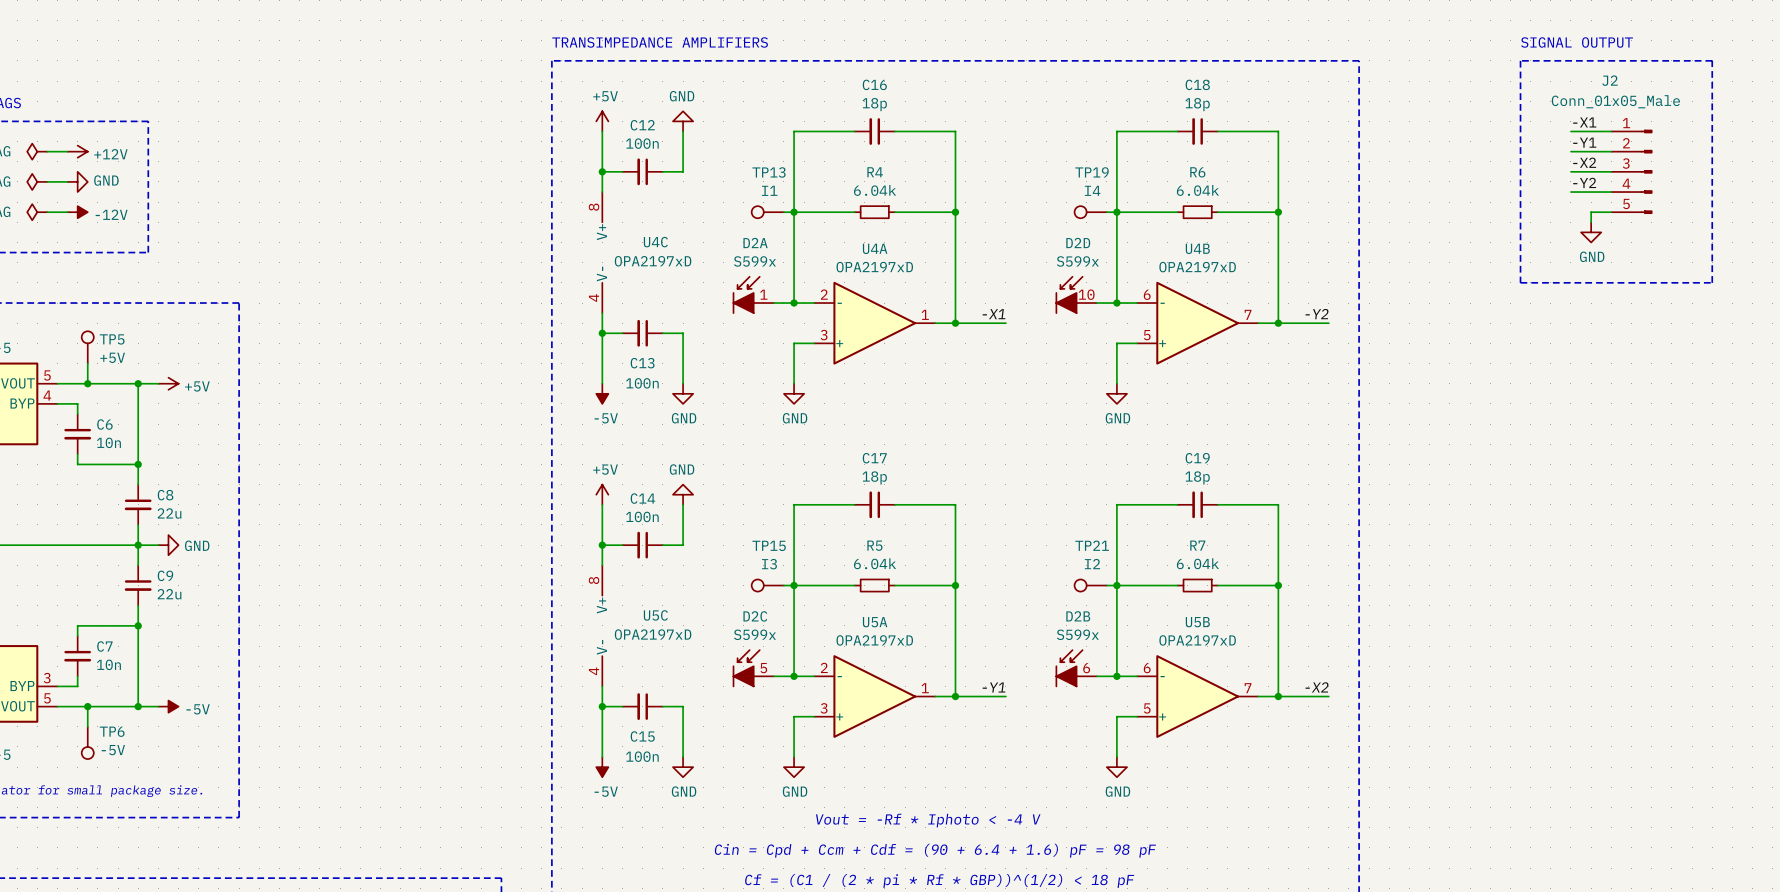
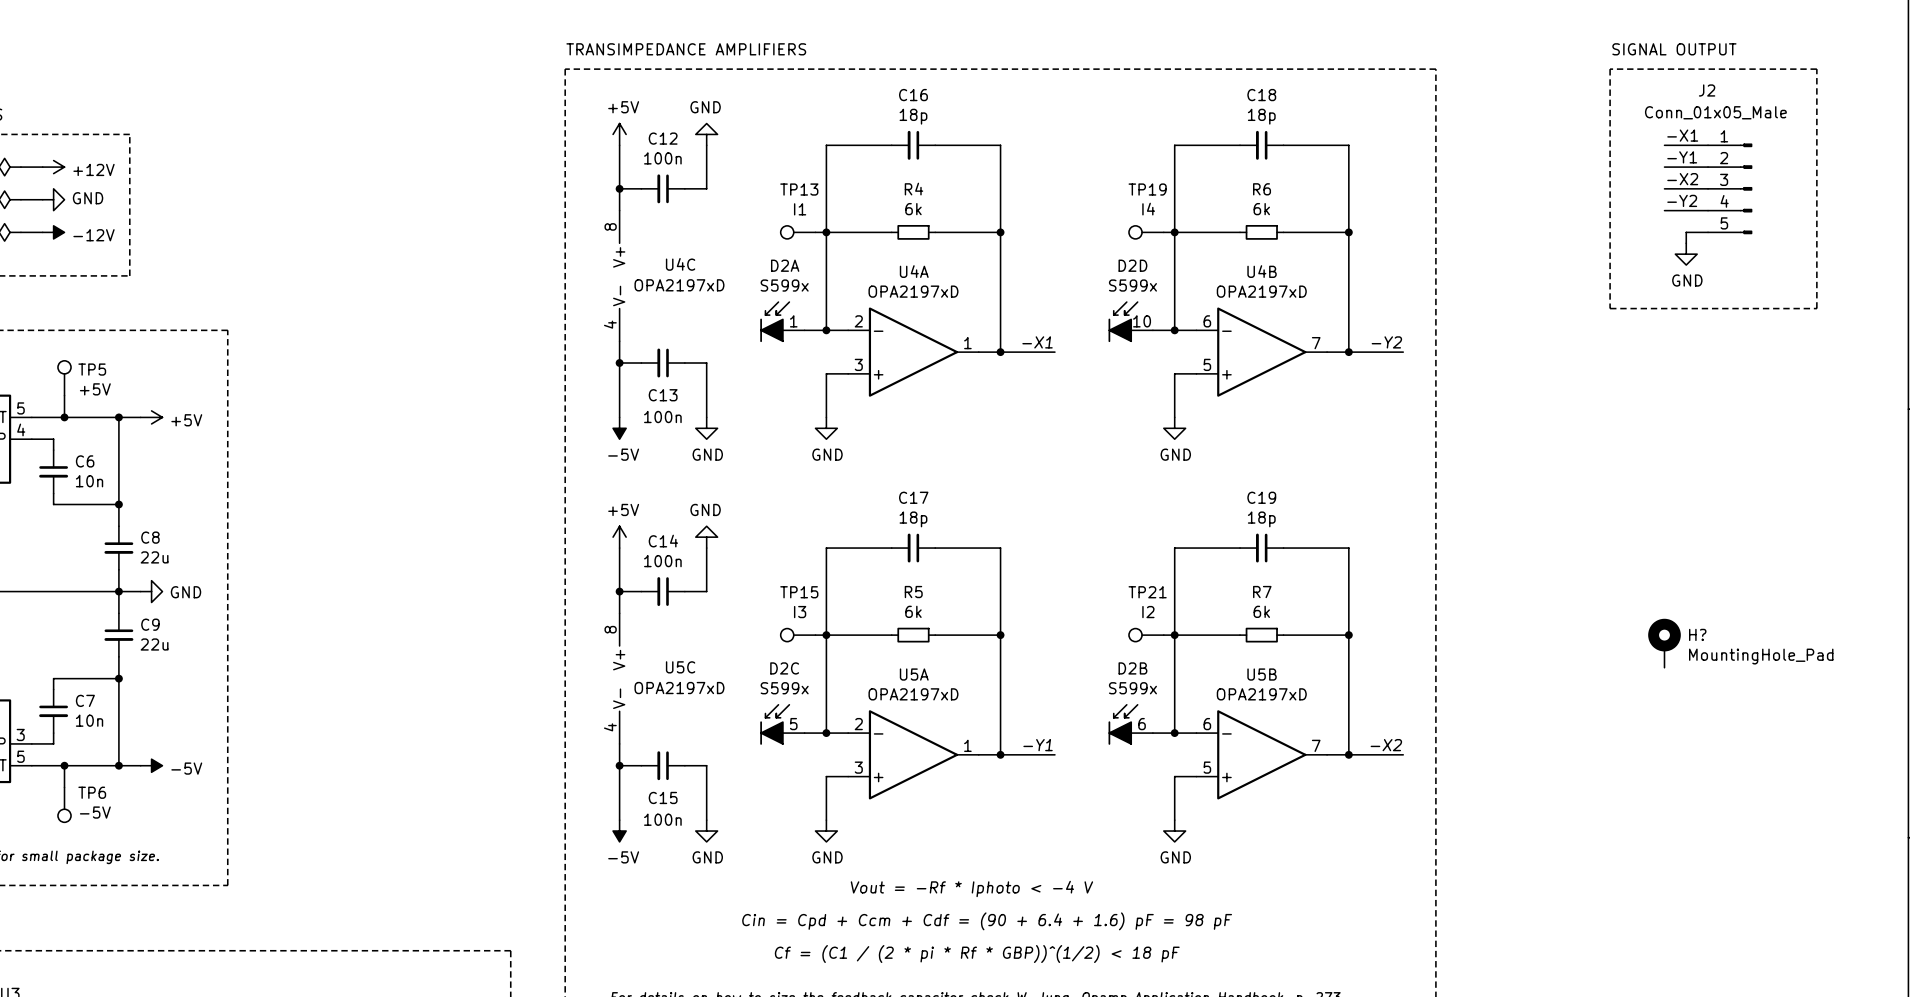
R4 value: 6.04k (875, 190) -> 6k (913, 209)
R6 value: 6.04k (1197, 190) -> 6k (1261, 209)
R5 value: 6.04k (875, 563) -> 6k (913, 611)
R7 value: 6.04k (1197, 563) -> 6k (1261, 611)
H?: none -> MountingHole_Pad (1664, 643)

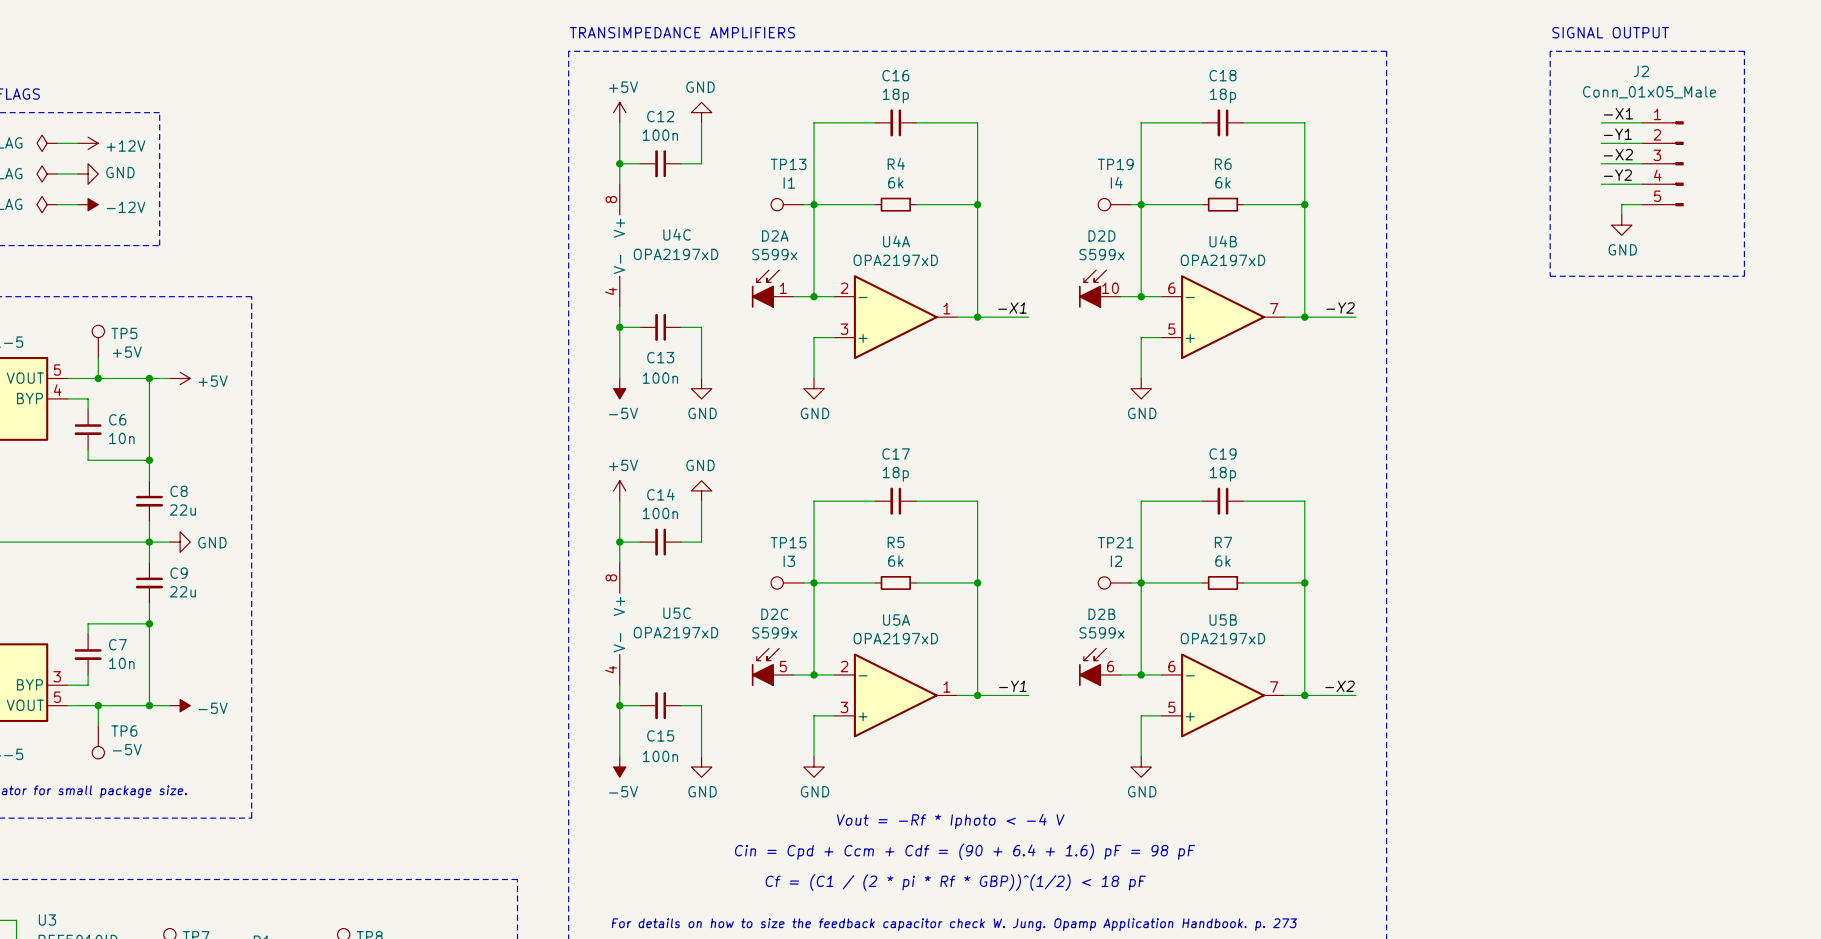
H?: MountingHole_Pad (1664, 643) -> none

